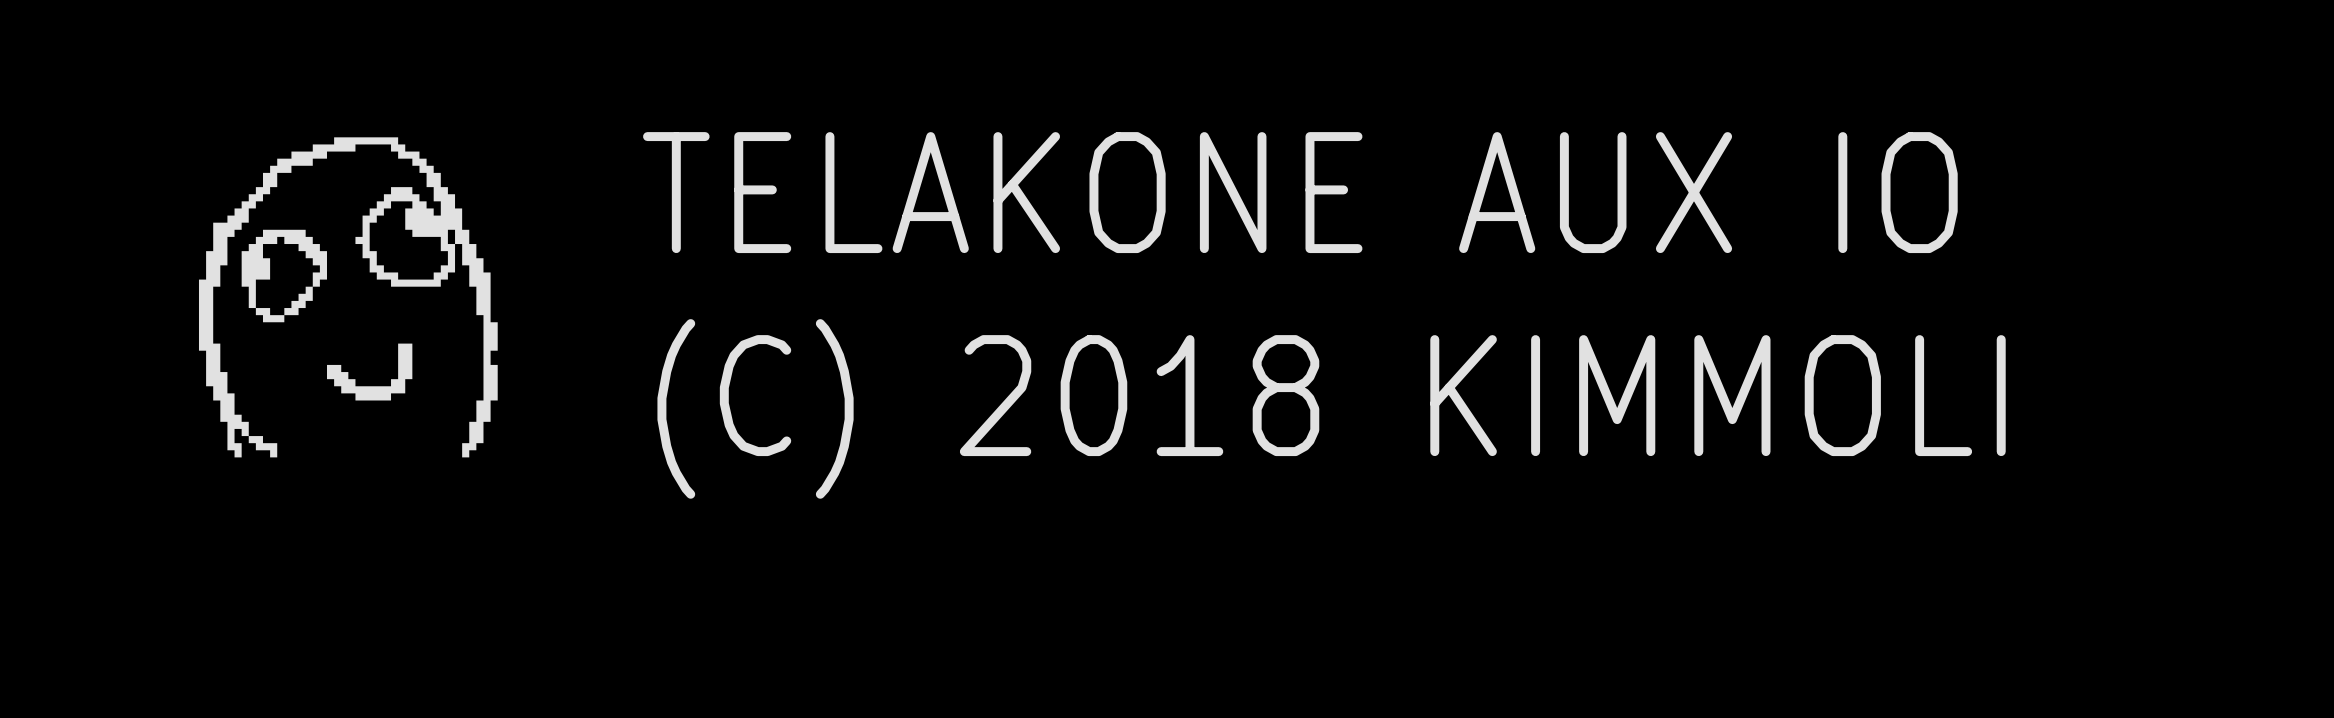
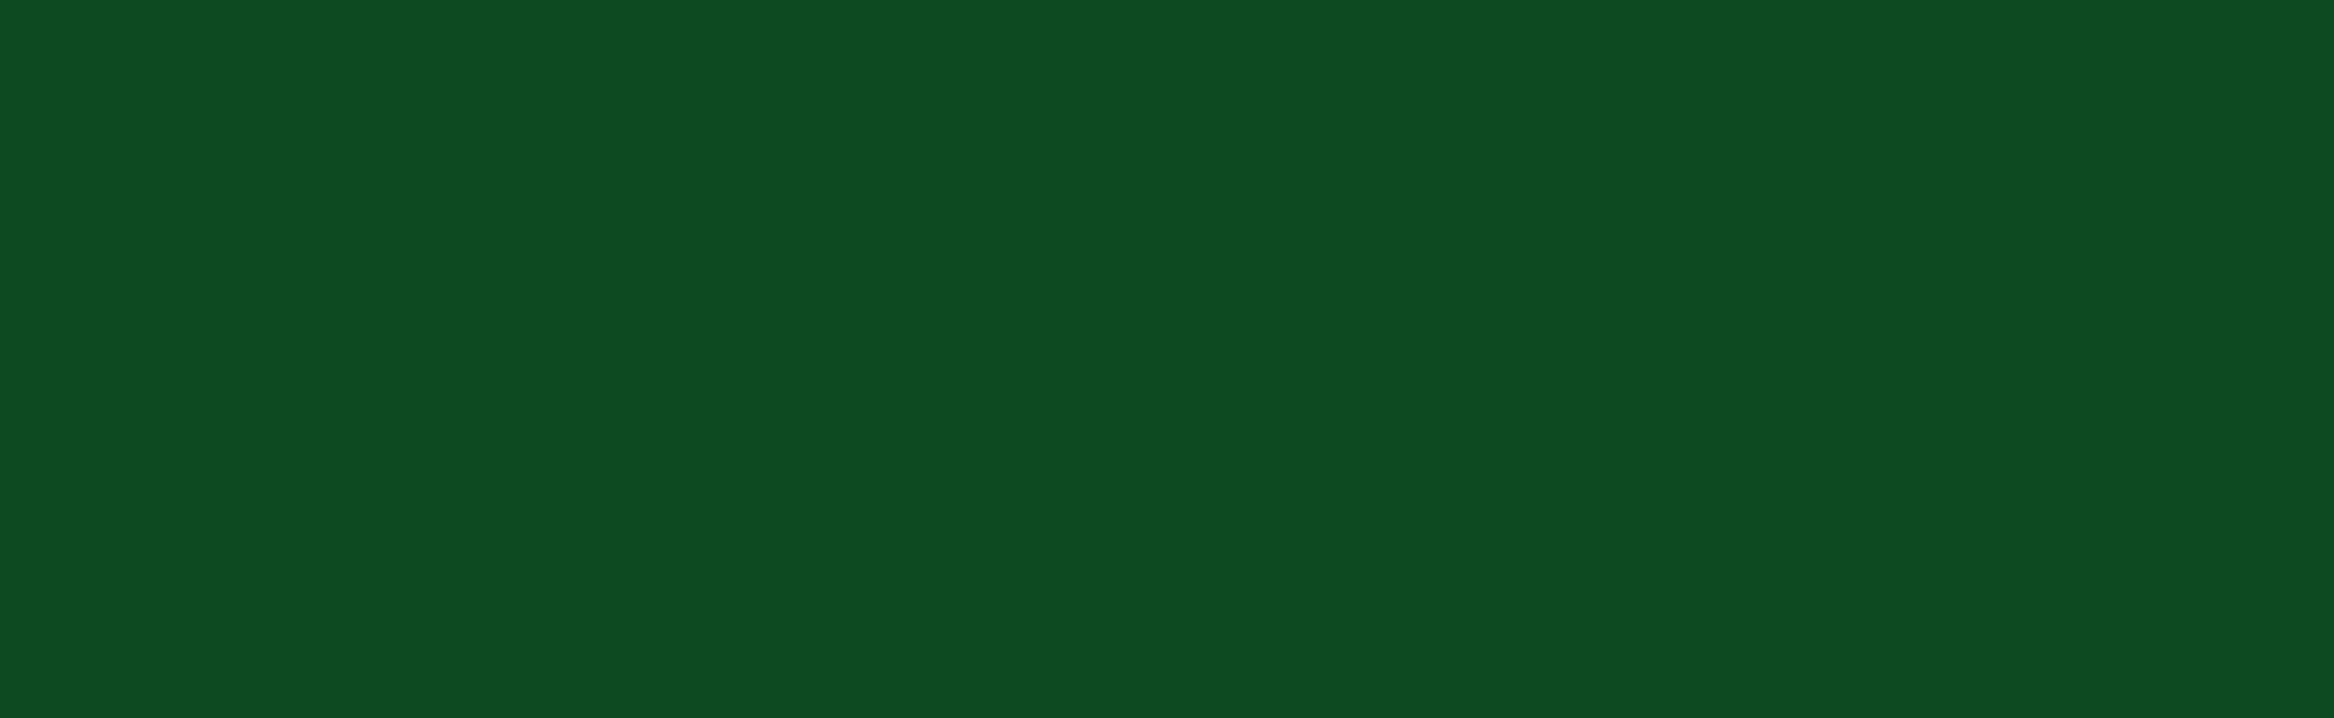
drawing: [198, 137, 498, 458] -> none
text: TELAKONE AUX IO (1300, 192) -> none
text: (C) 2018 KIMMOLI (1331, 408) -> none

